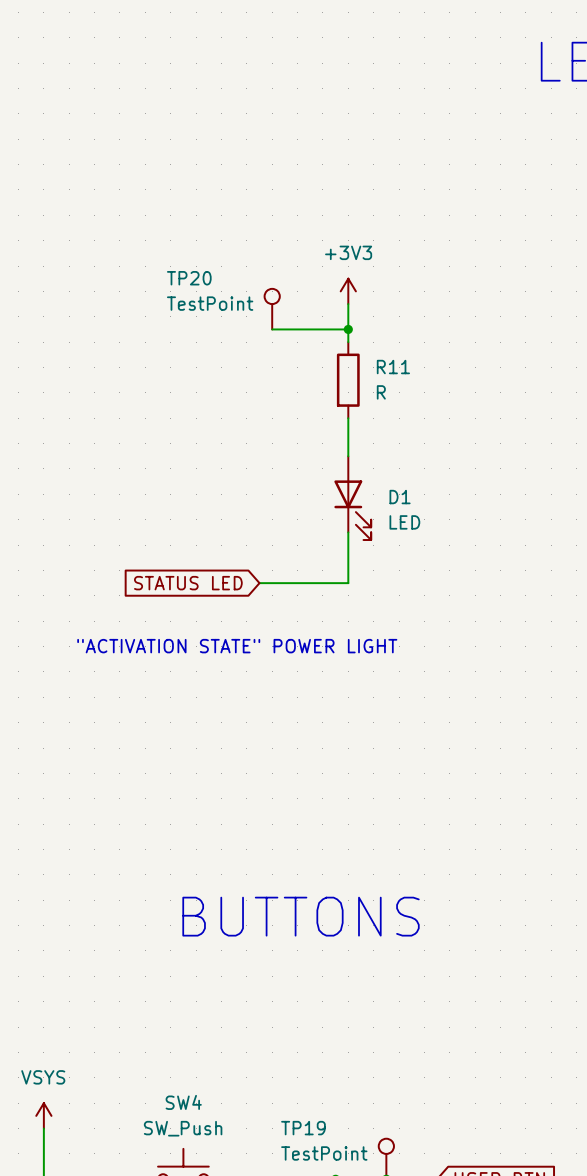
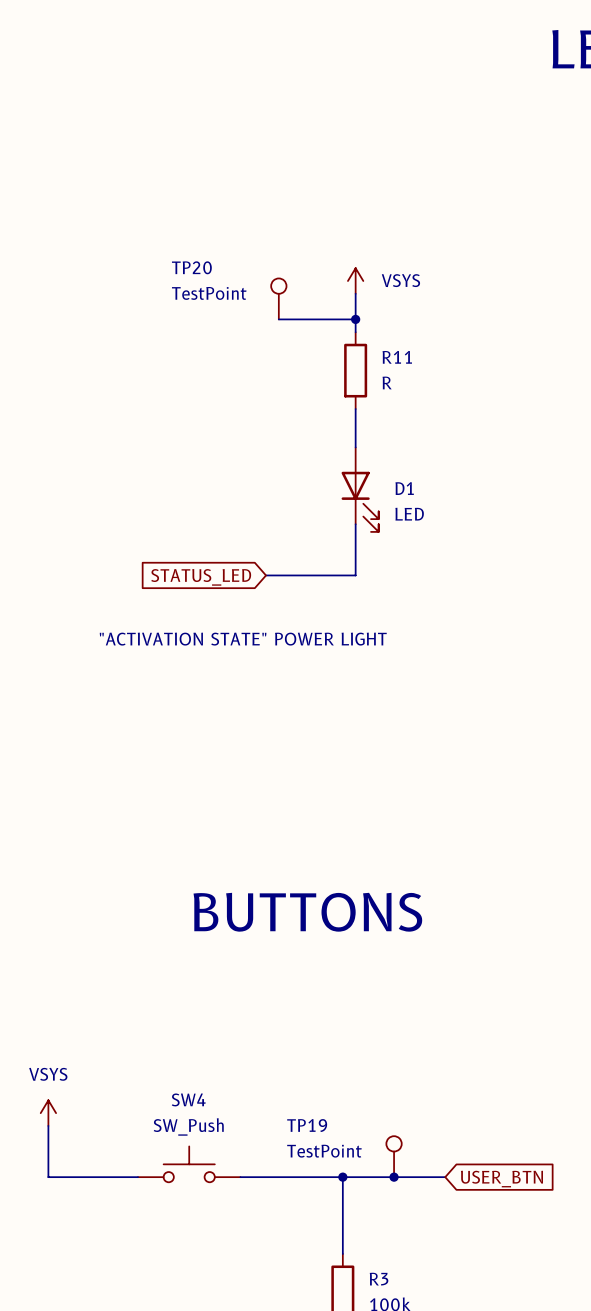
power symbol: +3V3 (348, 291) -> VSYS (355, 281)
global label: STATUS LED (188, 583) -> STATUS_LED (201, 577)

